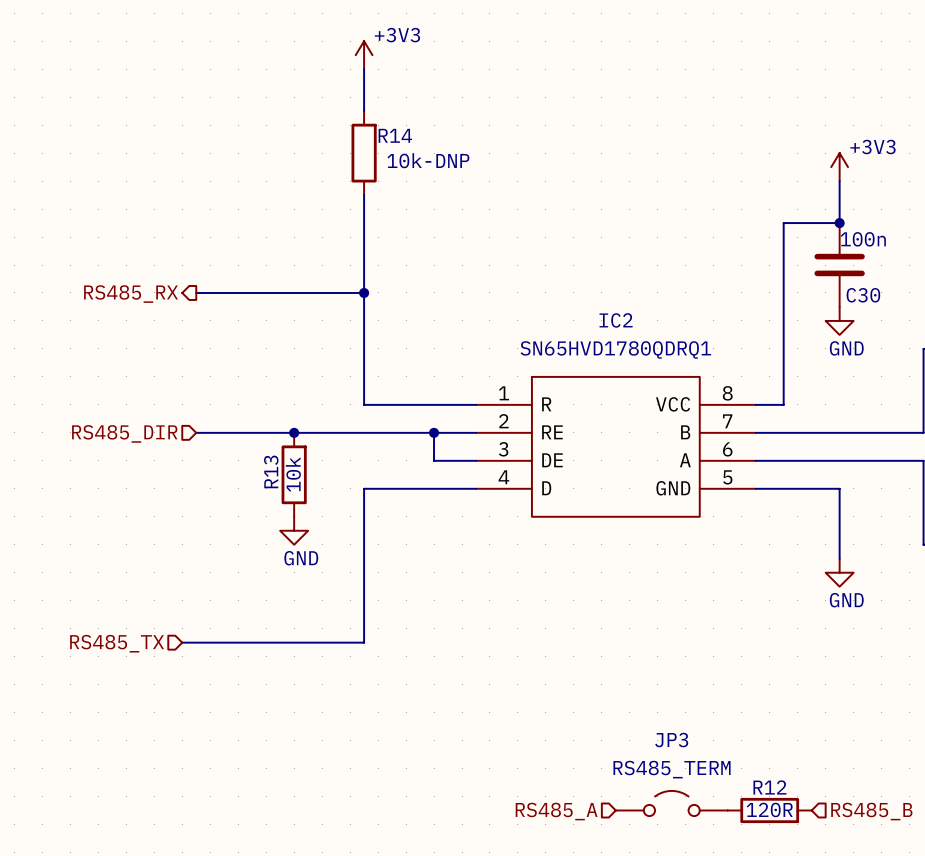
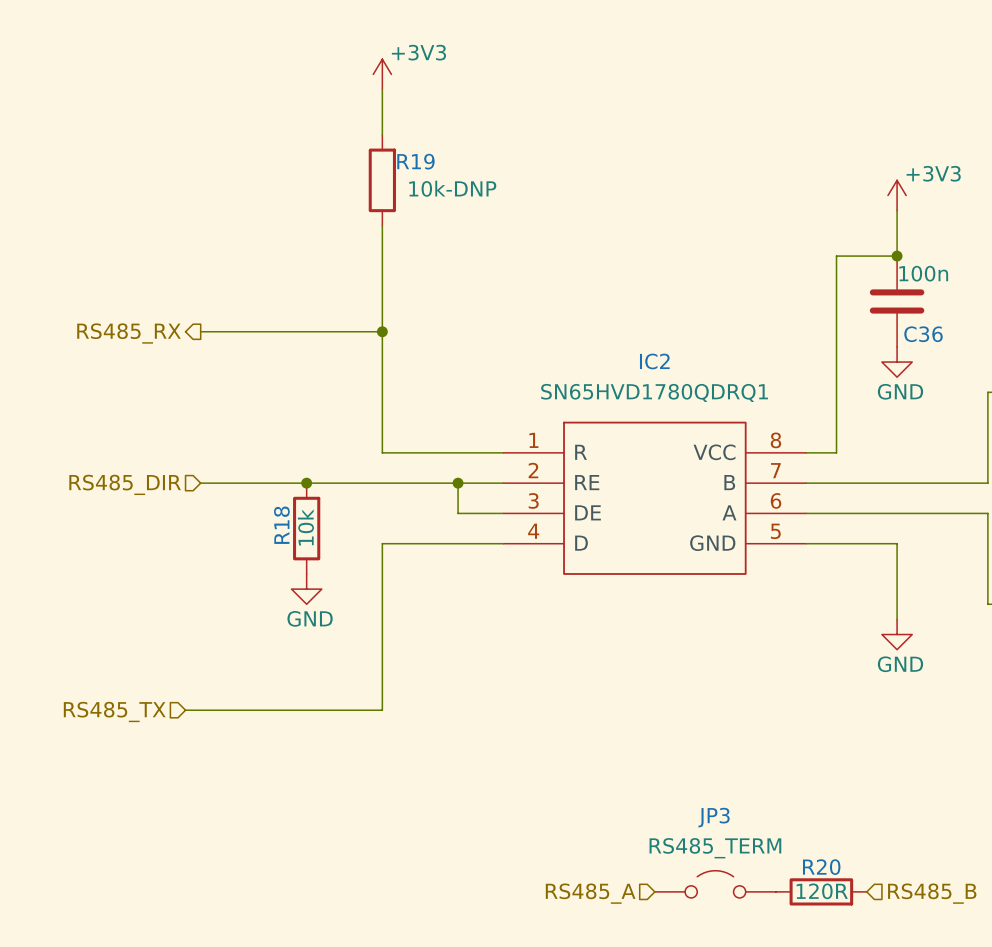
R14 name: R14 (395, 135) -> R19 (415, 161)
C30 name: C30 (863, 295) -> C36 (923, 334)
R13 name: R13 (271, 471) -> R18 (281, 525)
R12 name: R12 (769, 787) -> R20 (821, 867)

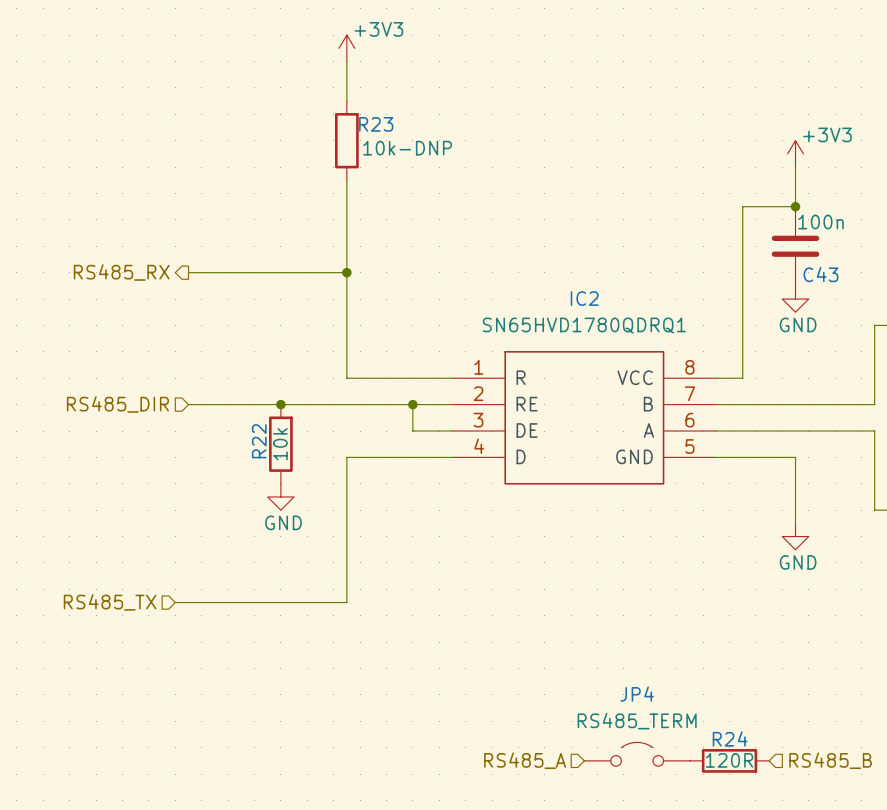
R19 name: R19 (415, 161) -> R23 (376, 124)
C36 name: C36 (923, 334) -> C43 (820, 274)
R18 name: R18 (281, 525) -> R22 (259, 441)
JP3 name: JP3 (714, 817) -> JP4 (637, 694)
R20 name: R20 (821, 867) -> R24 (730, 738)

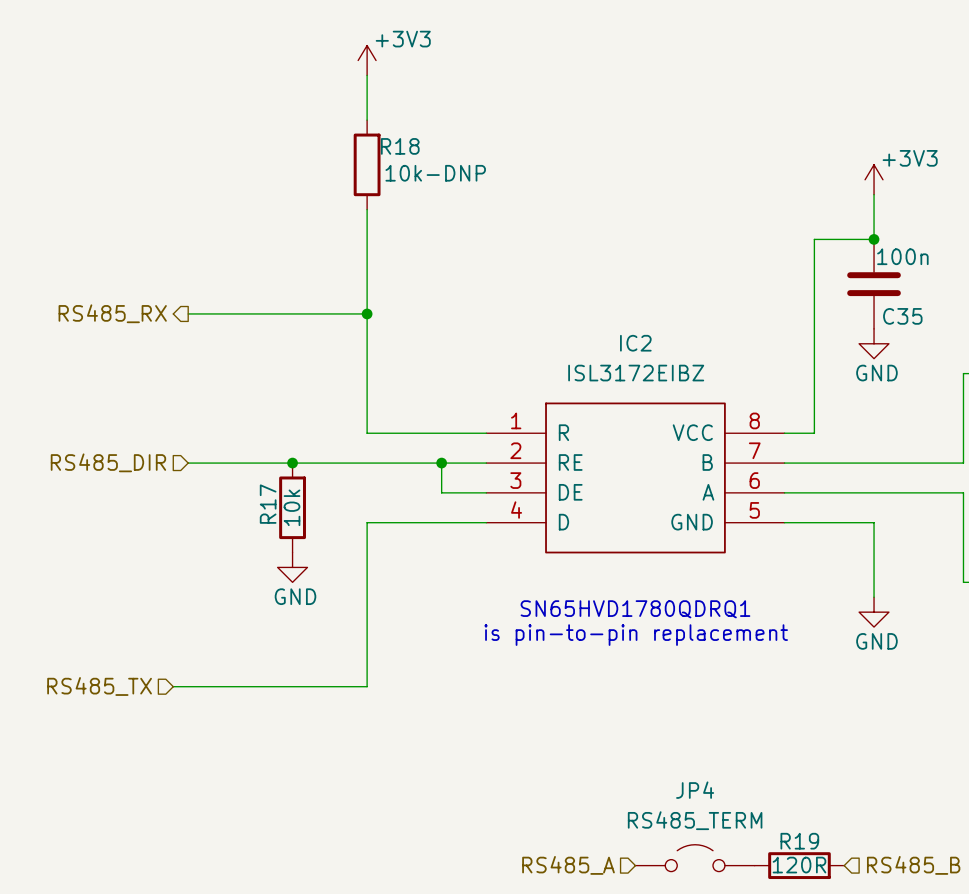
R23 name: R23 (376, 124) -> R18 (400, 146)
C43 name: C43 (820, 274) -> C35 (902, 316)
IC2 value: SN65HVD1780QDRQ1 (584, 325) -> ISL3172EIBZ (636, 373)
R22 name: R22 (259, 441) -> R17 (268, 504)
text: none -> SN65HVD1780QDRQ1 (635, 609)
text: none -> is pin-to-pin replacement (636, 635)
R24 name: R24 (730, 738) -> R19 (799, 841)

